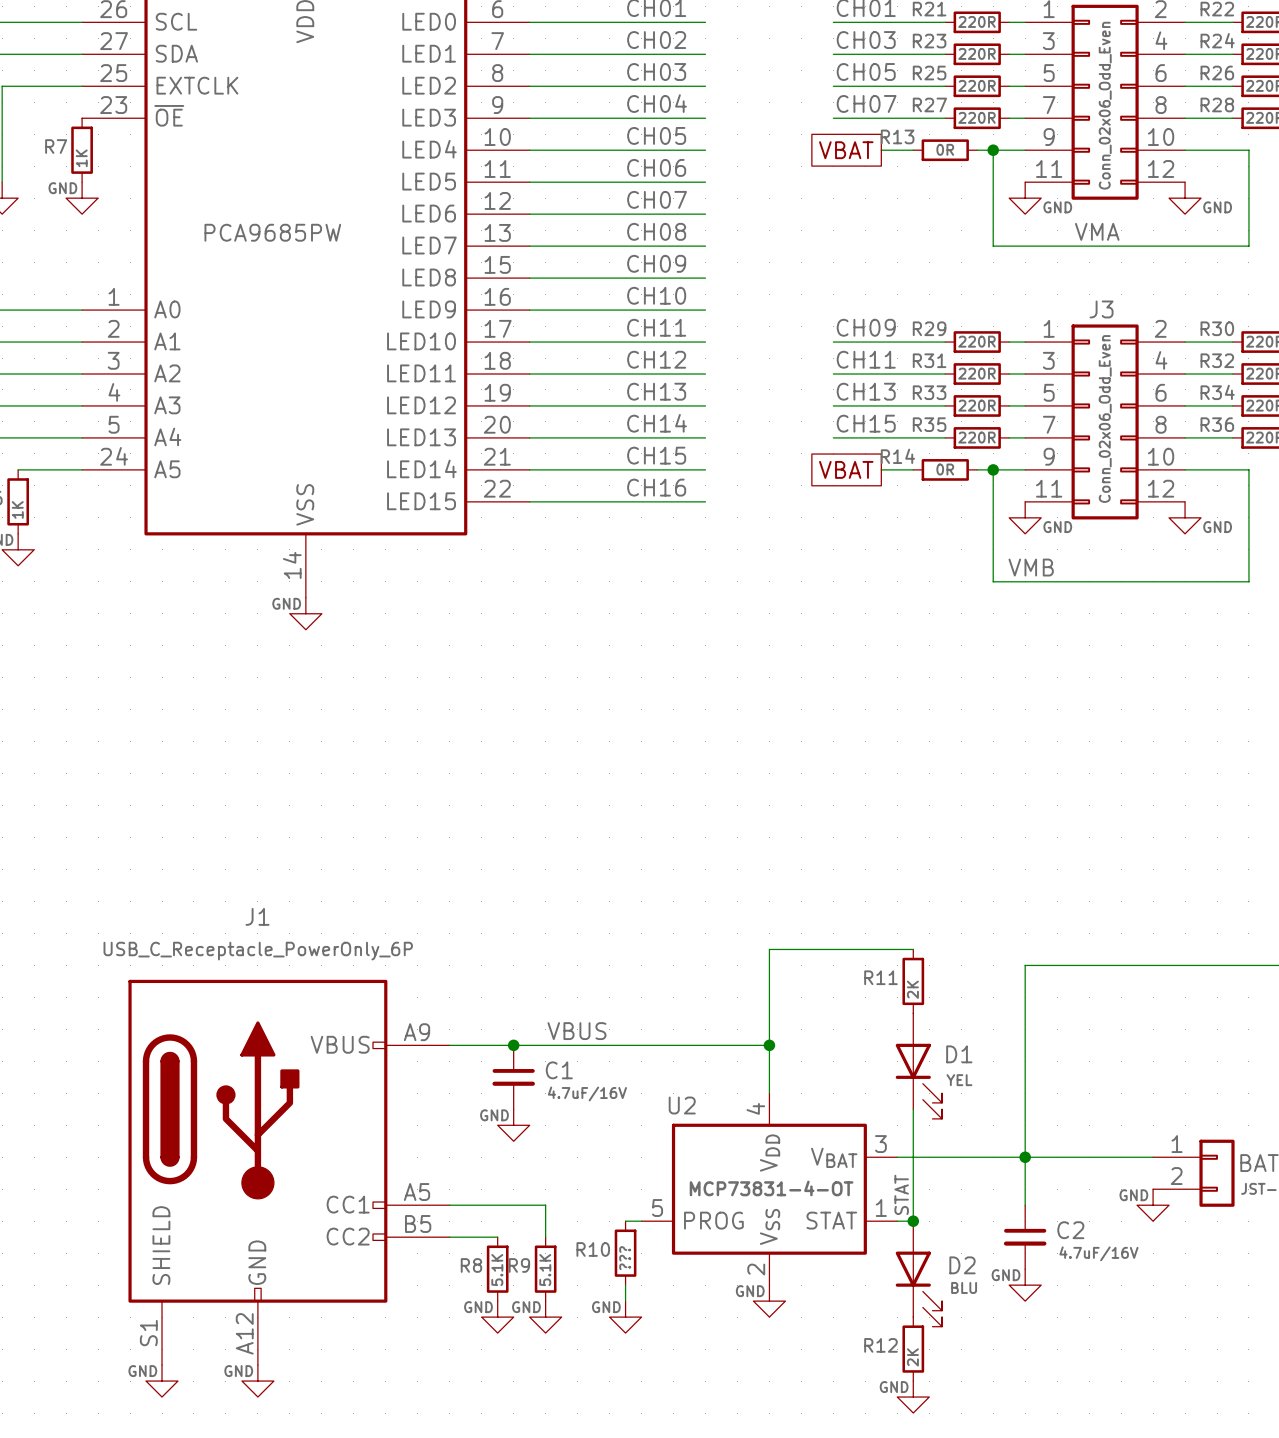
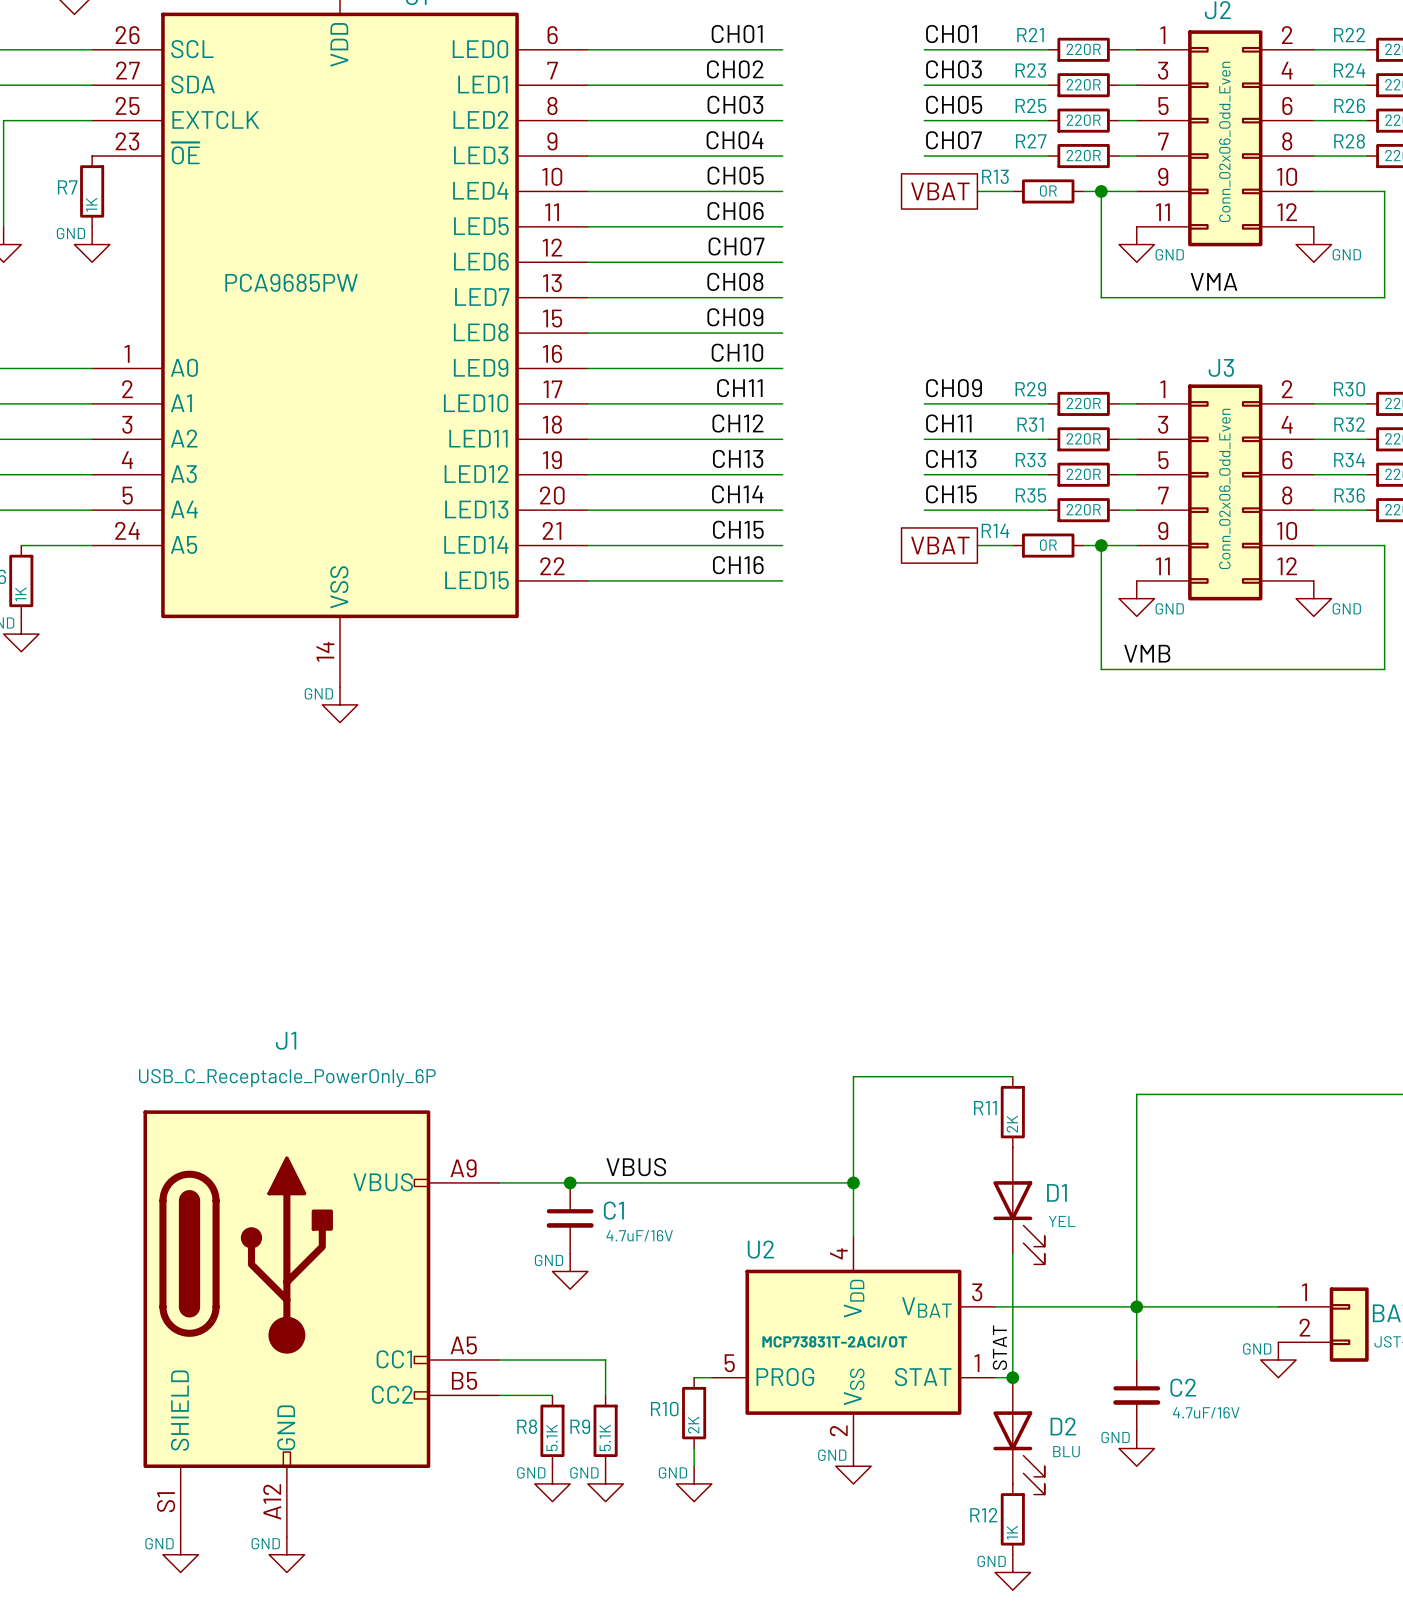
U2 value: MCP73831-4-OT (771, 1188) -> MCP73831T-2ACI/OT (834, 1341)
R10 value: ??? (625, 1258) -> 2K (693, 1424)
R12 value: 2K (912, 1357) -> 1K (1012, 1532)

